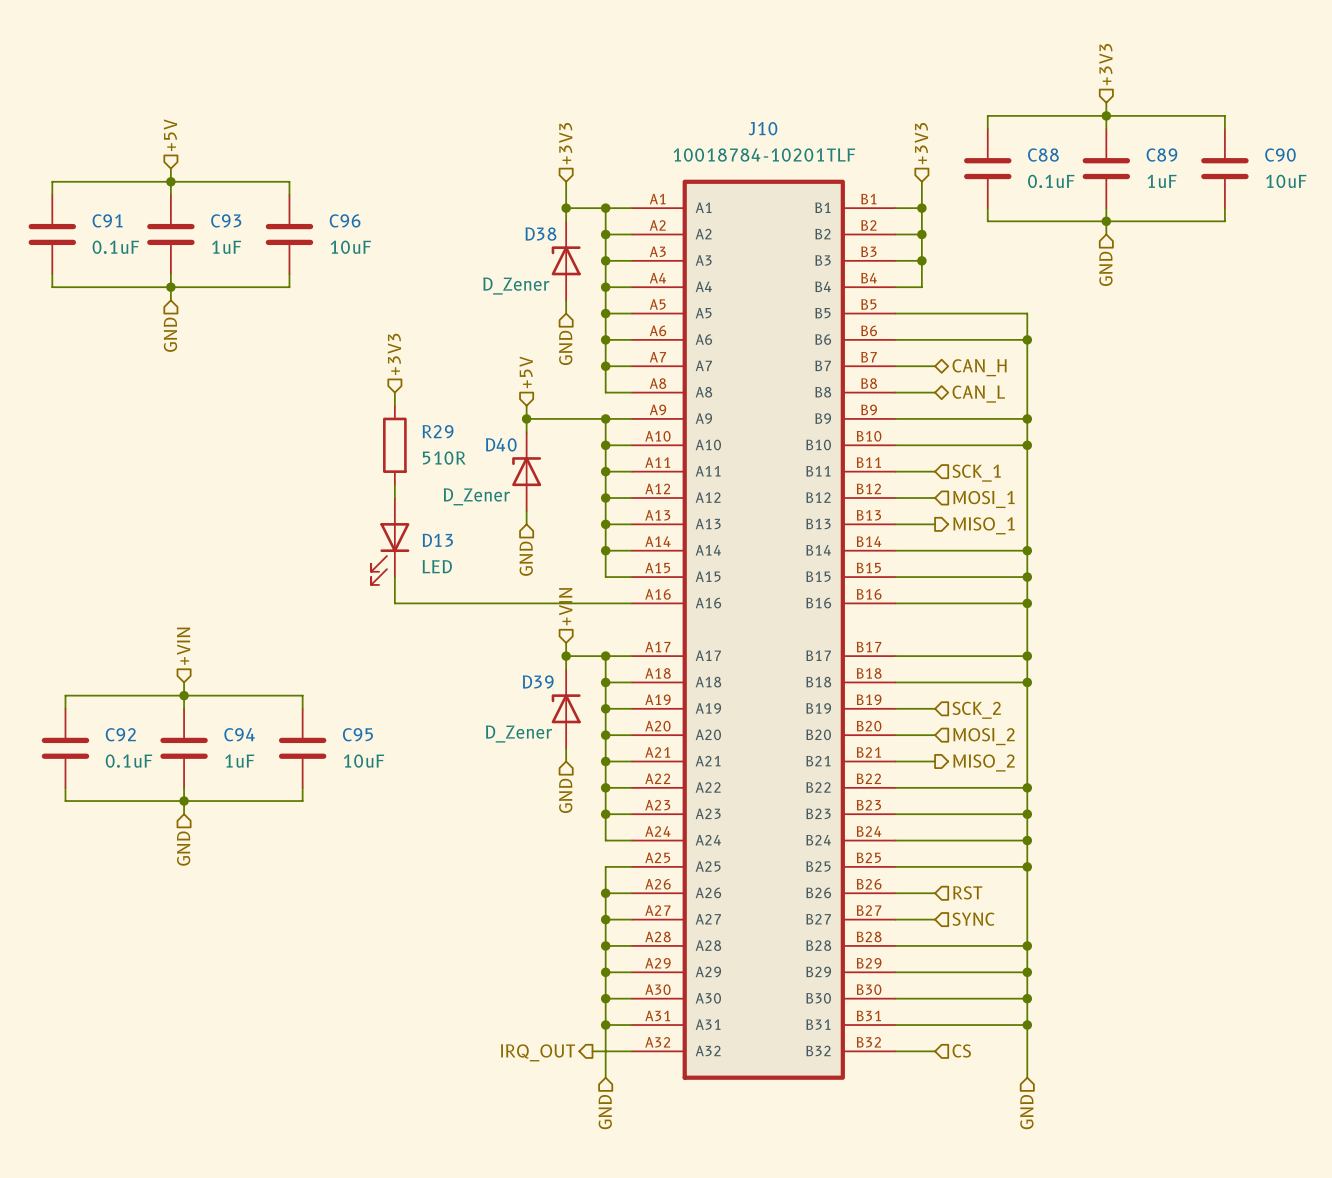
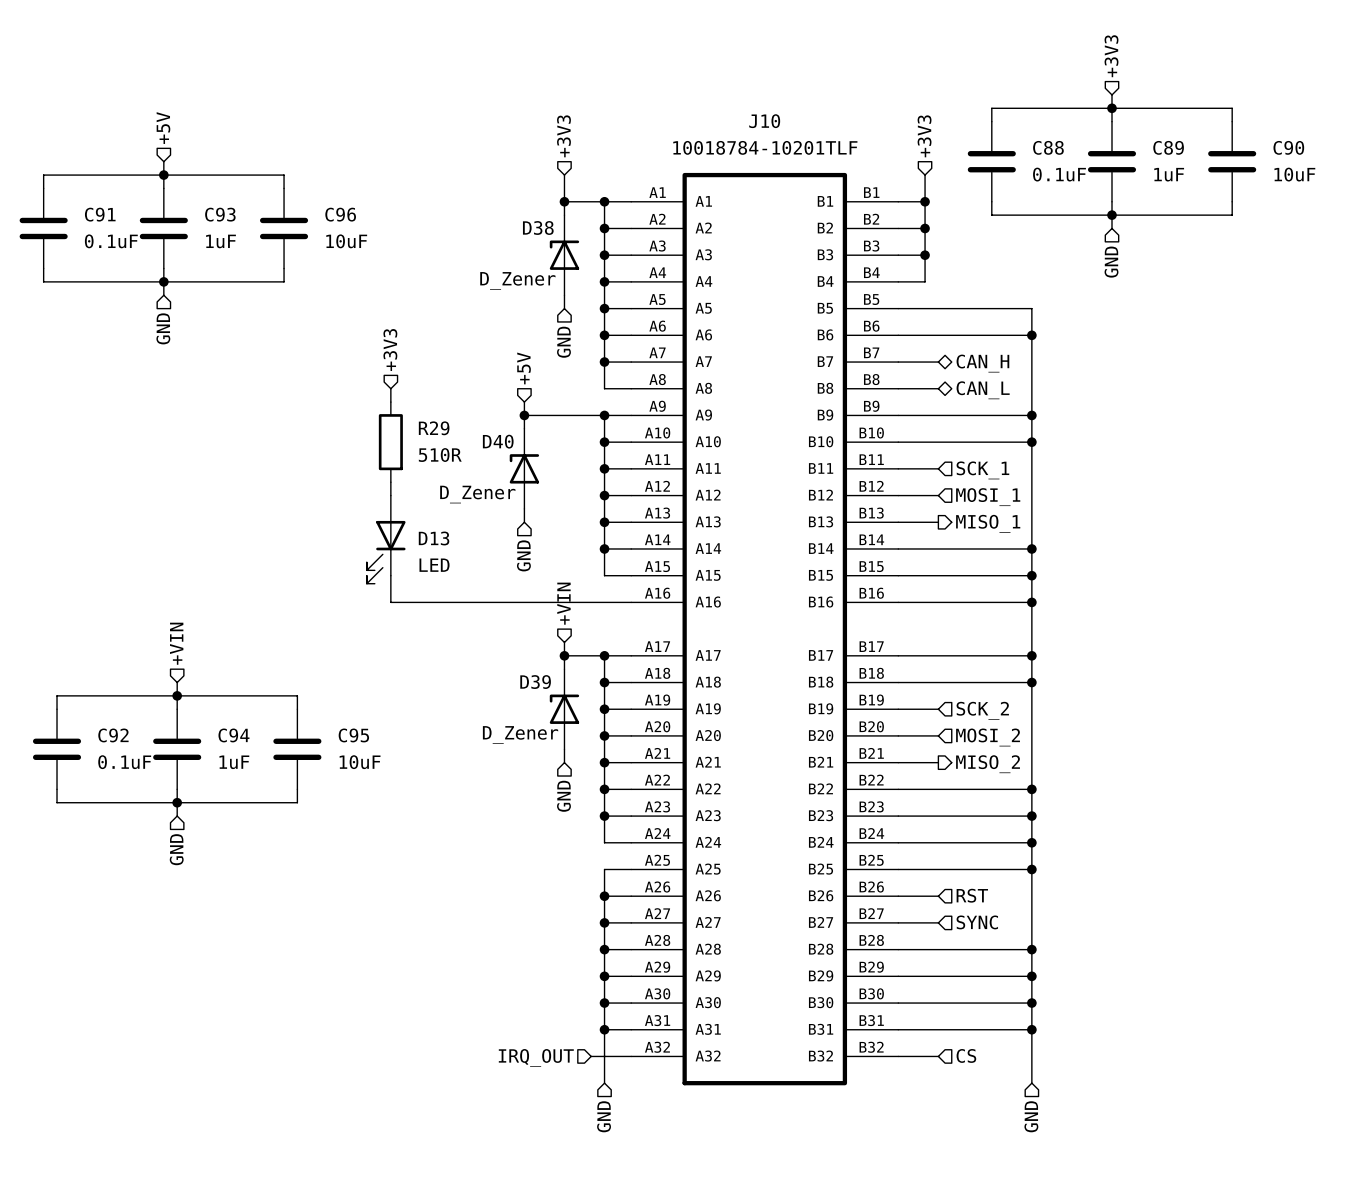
hierarchical label shape: output (537, 1052) -> input (536, 1057)

